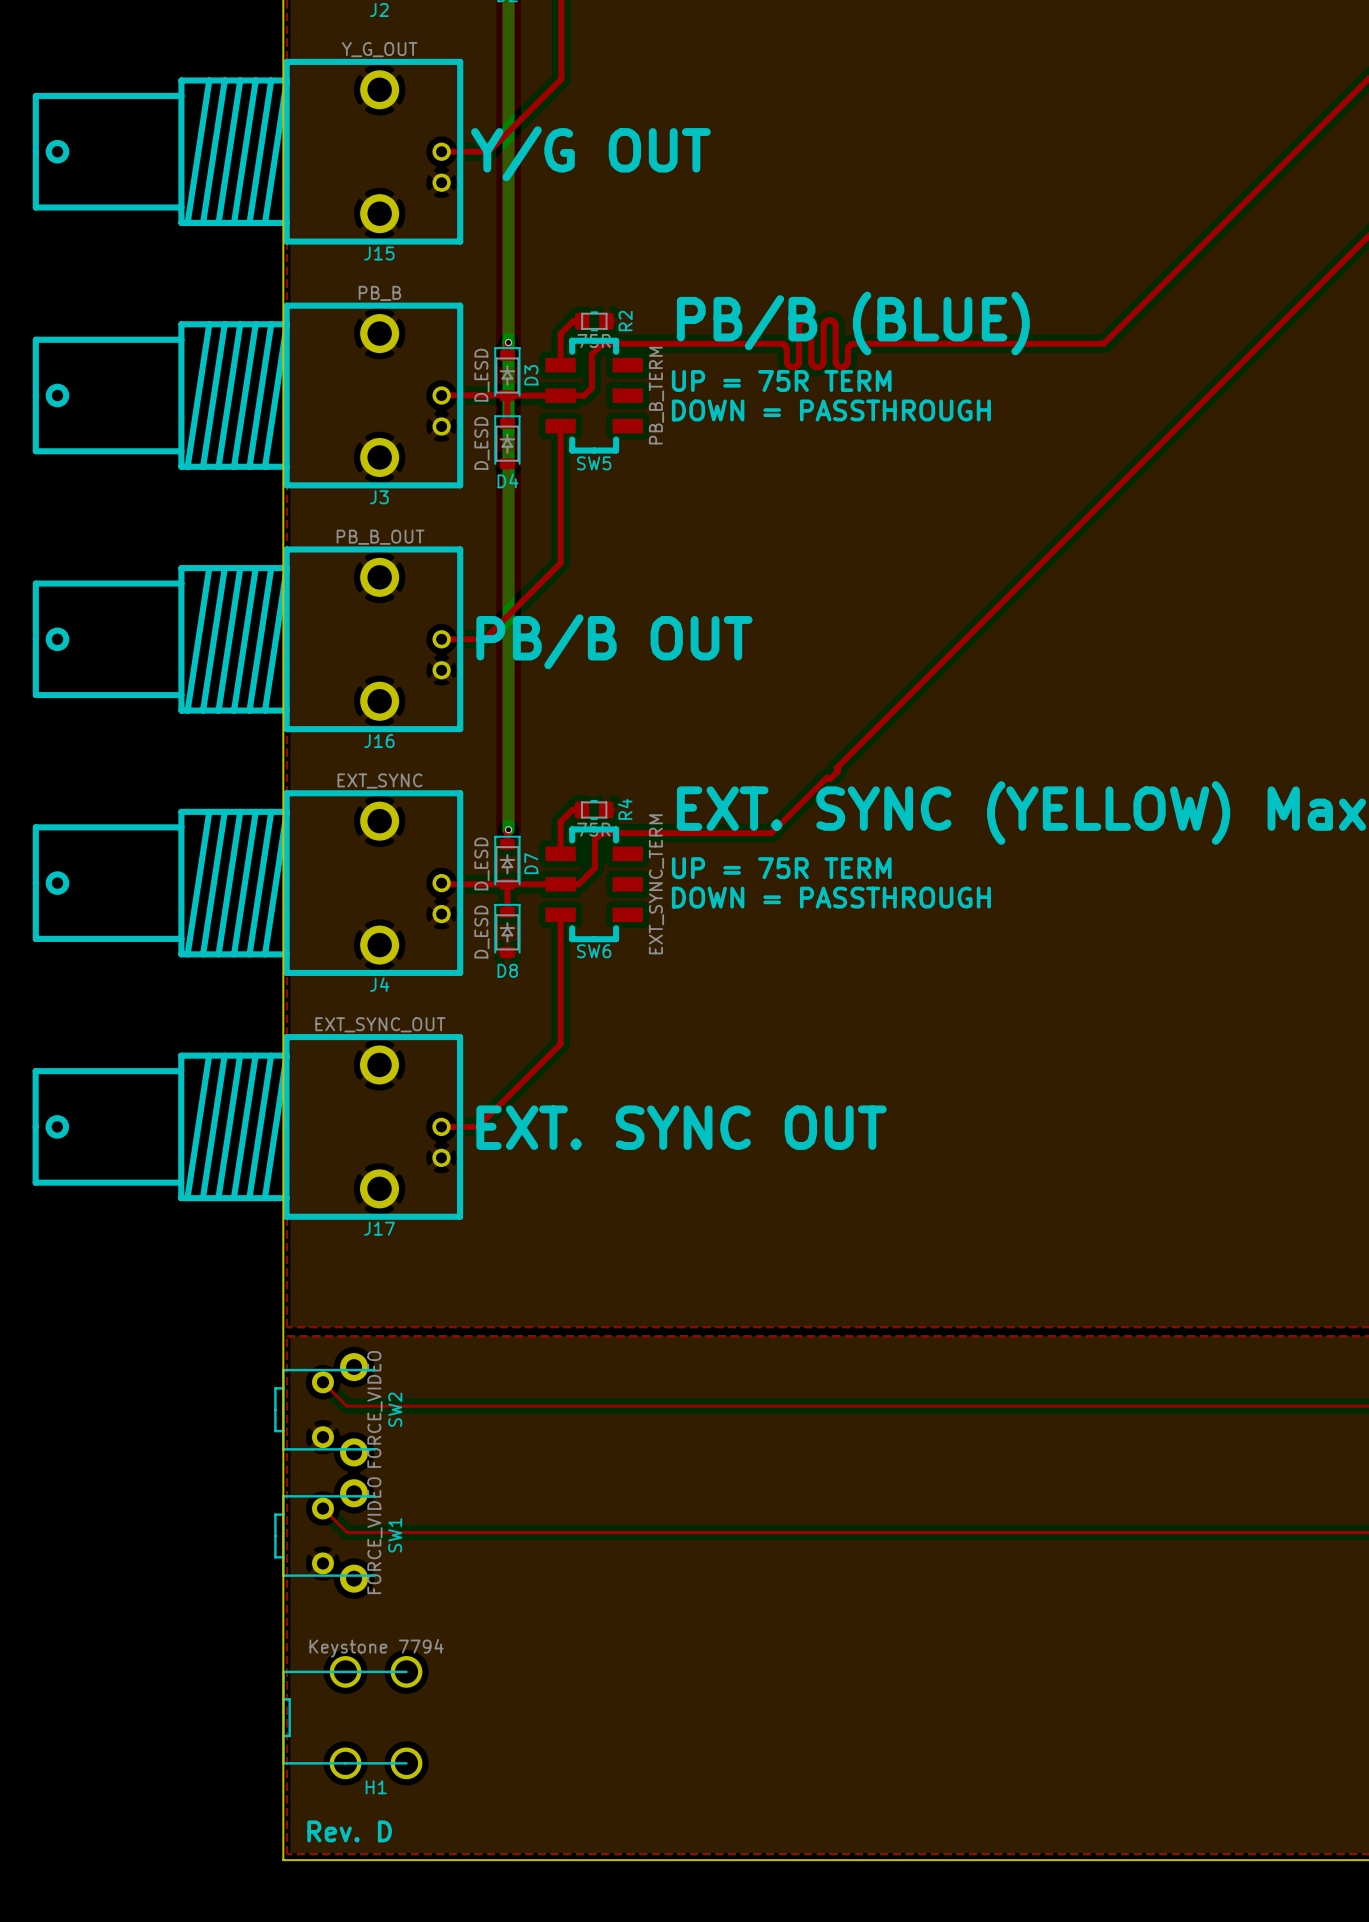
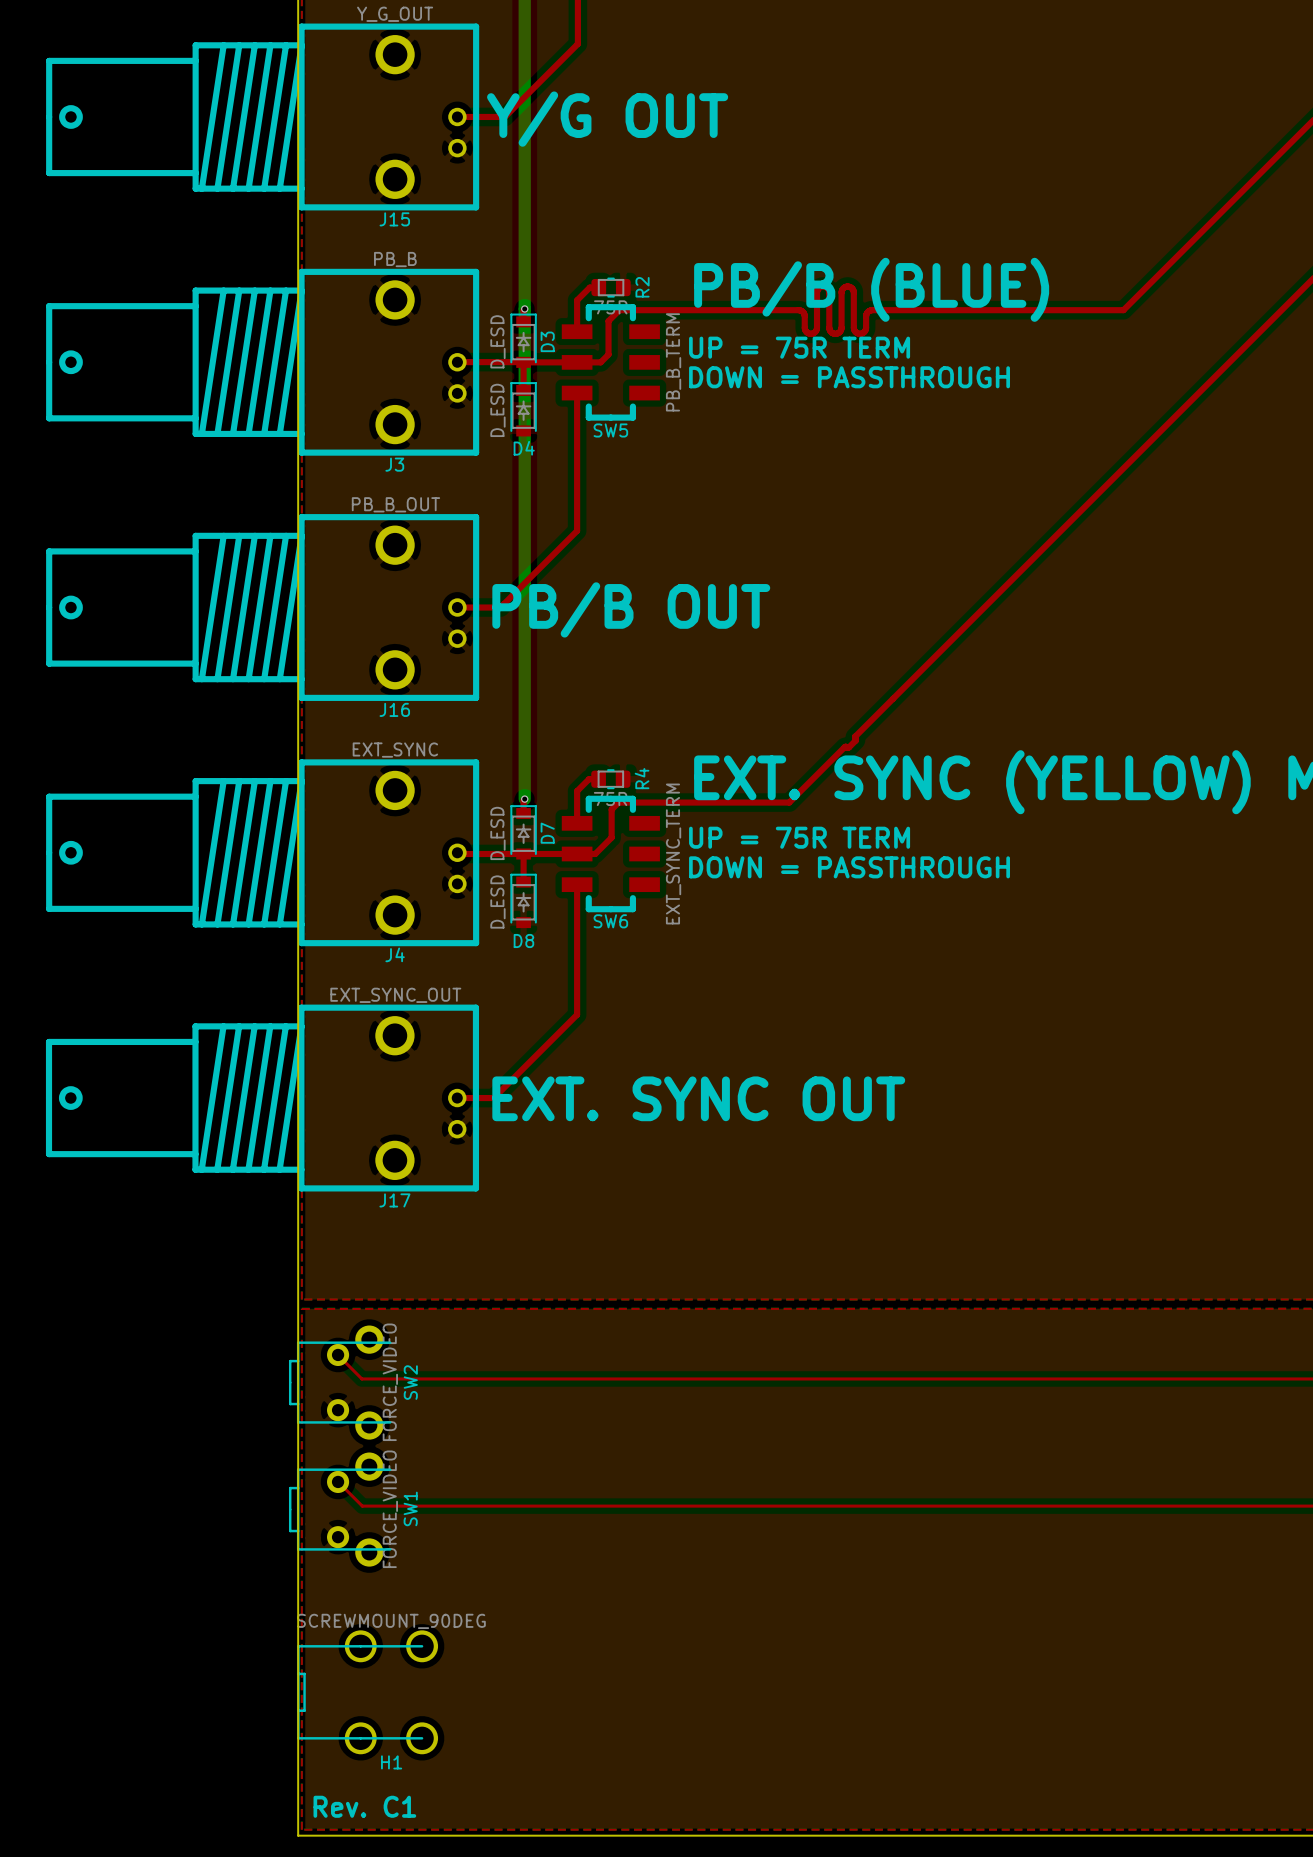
H1 value: Keystone 7794 (376, 1648) -> SCREWMOUNT_90DEG (391, 1621)
text: Rev. D (349, 1831) -> Rev. C1 (364, 1806)

